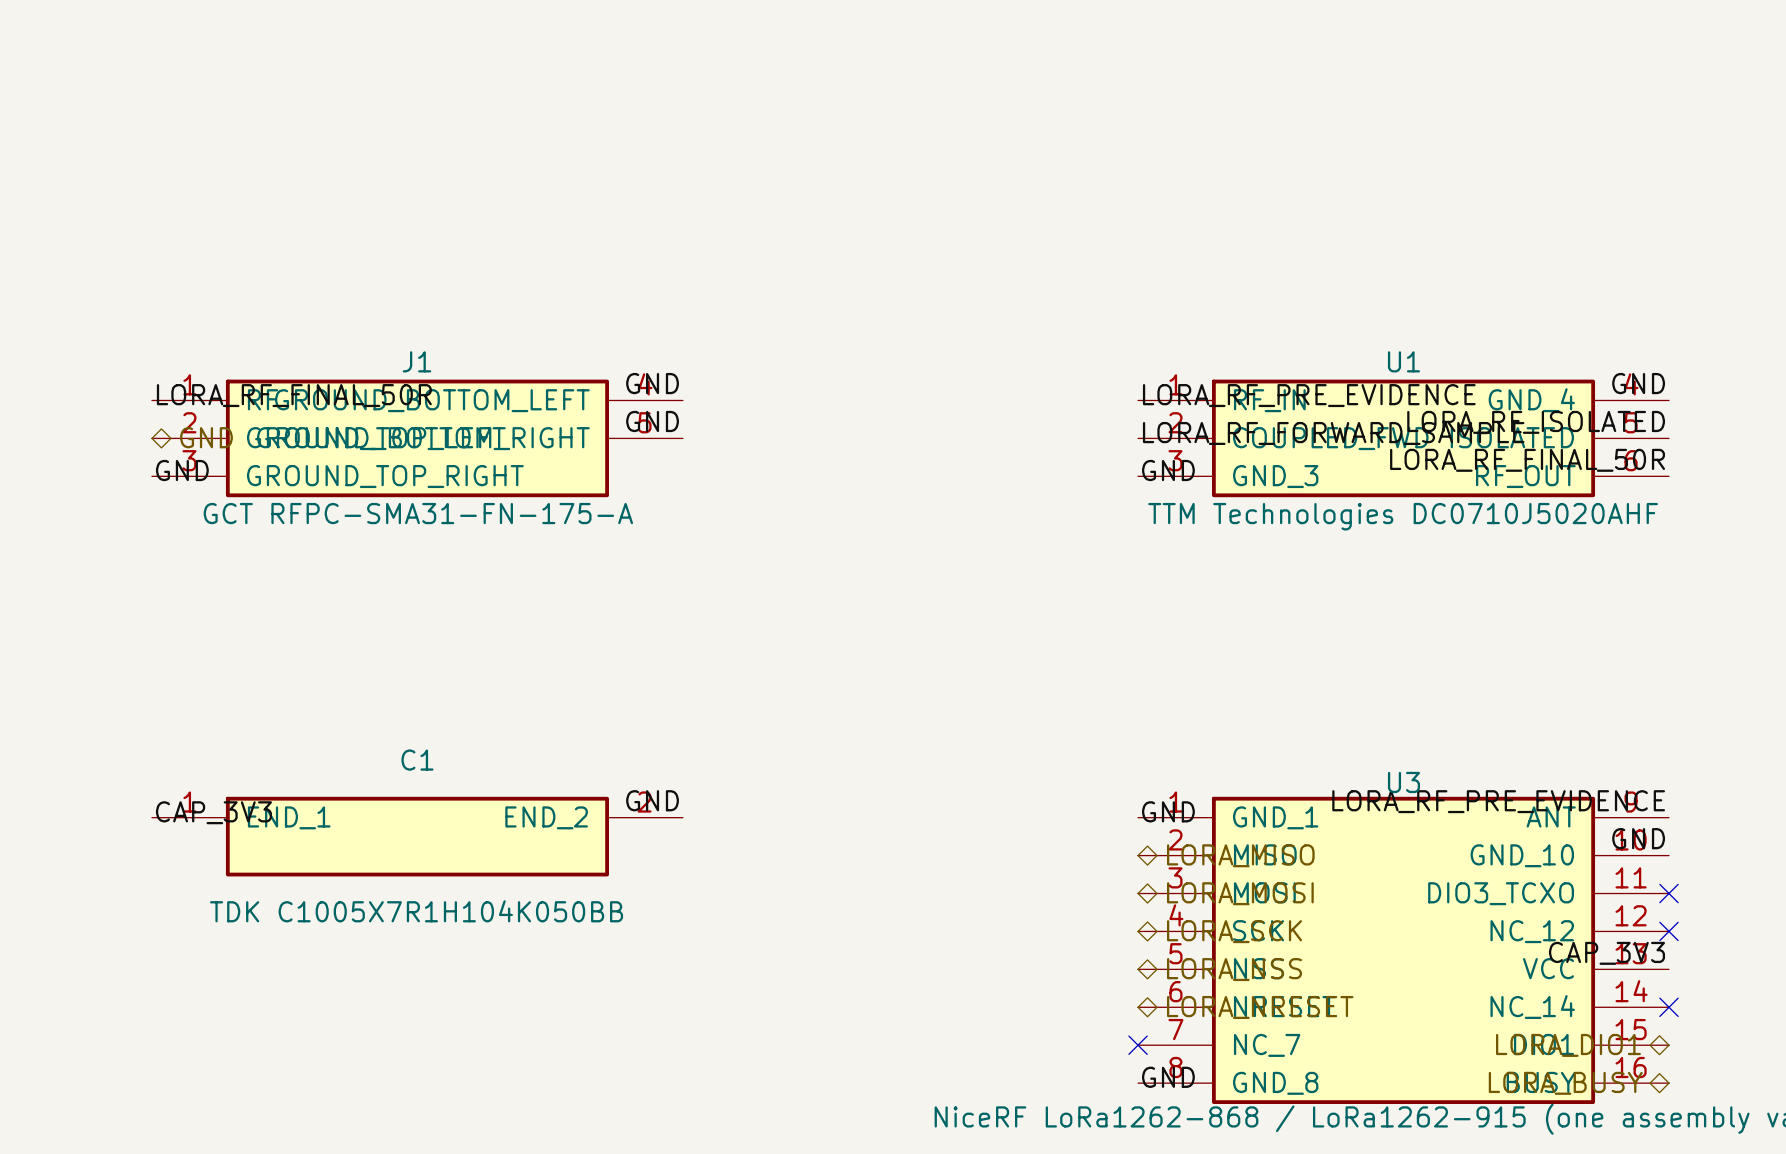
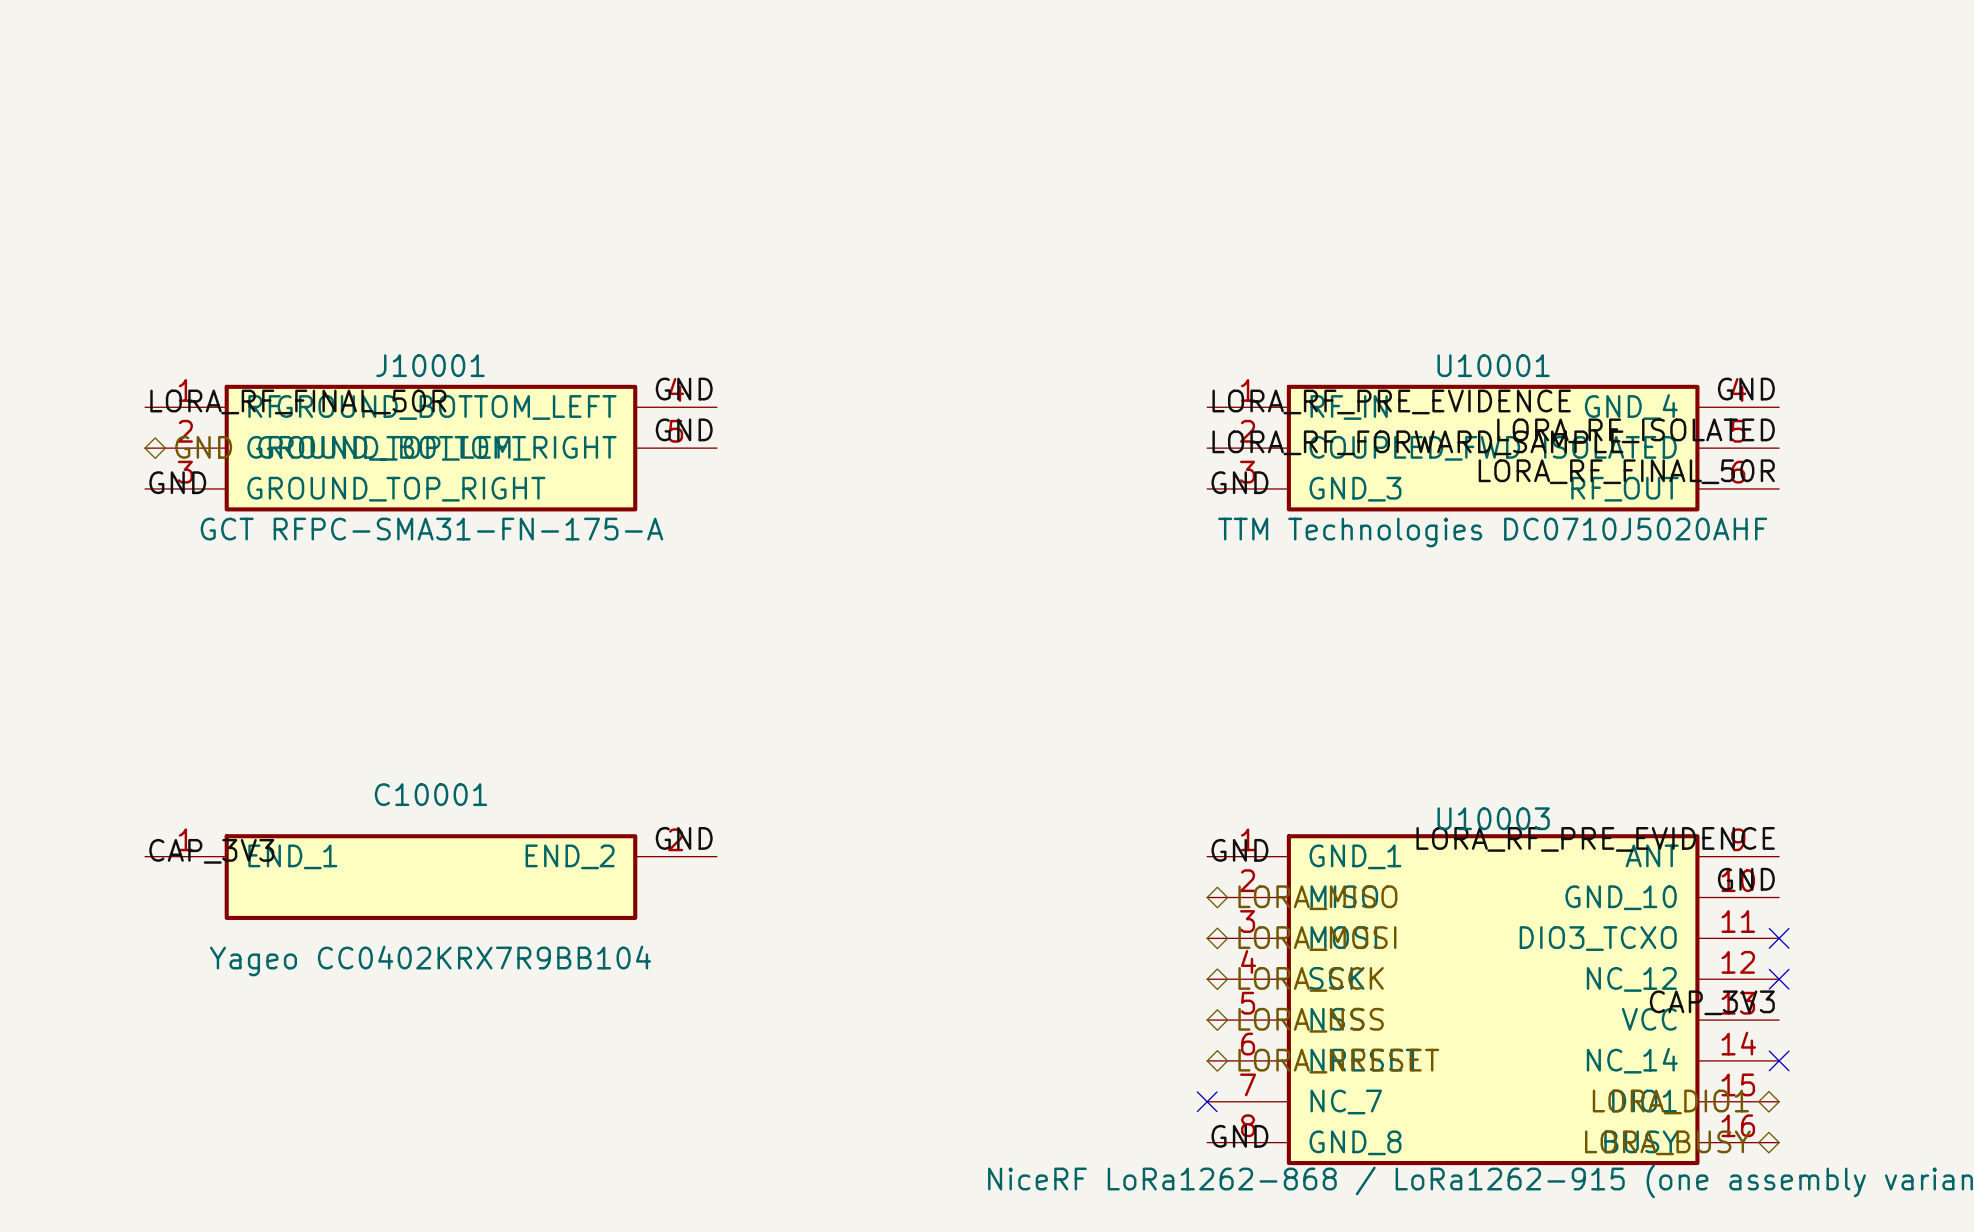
J1 name: J1 (417, 361) -> J10001 (430, 365)
U1 name: U1 (1403, 361) -> U10001 (1493, 365)
C1 name: C1 (417, 760) -> C10001 (430, 794)
U3 name: U3 (1403, 782) -> U10003 (1493, 818)
C1 value: TDK C1005X7R1H104K050BB (416, 911) -> Yageo CC0402KRX7R9BB104 (430, 960)

